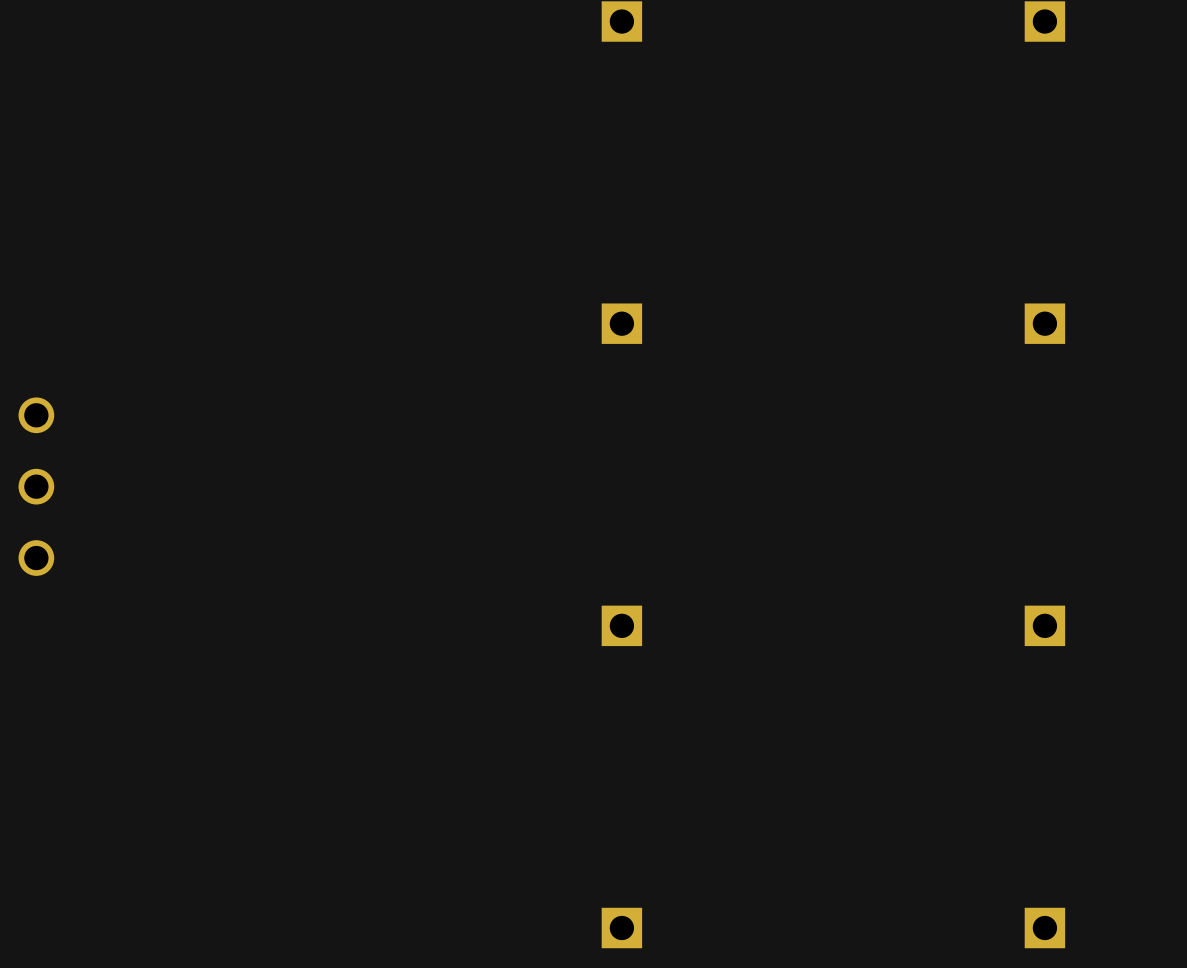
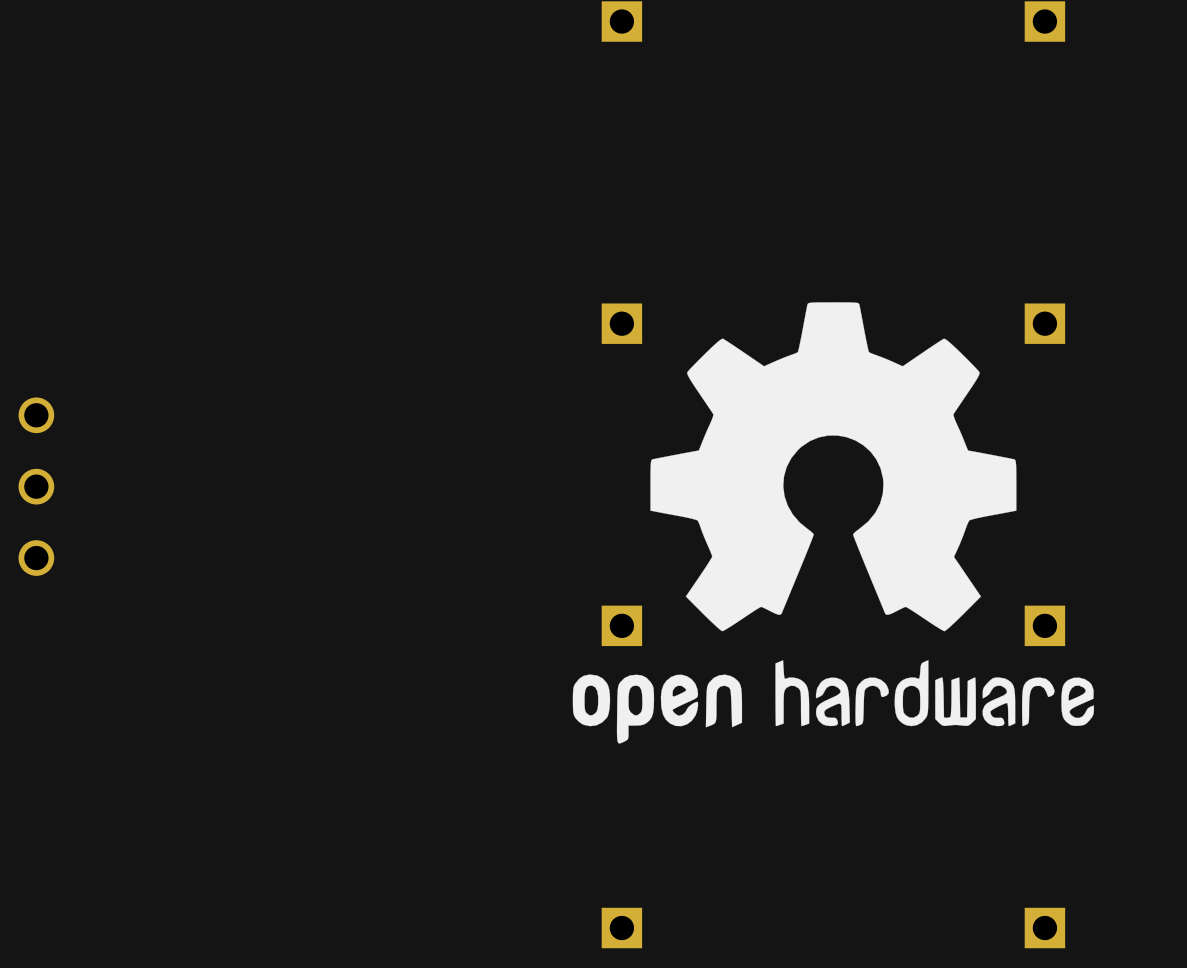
drawing: none -> [572, 302, 1095, 744]

